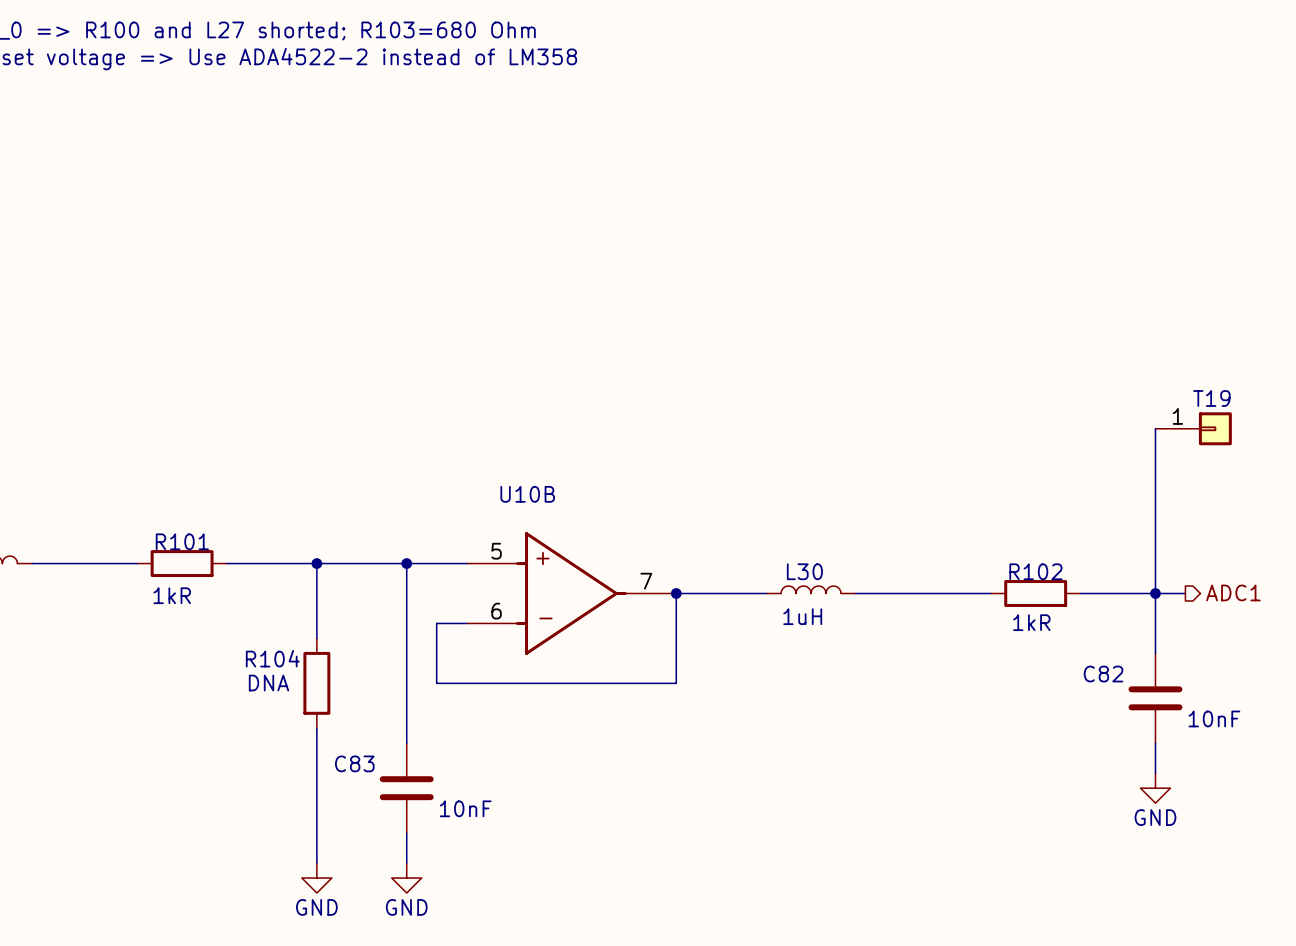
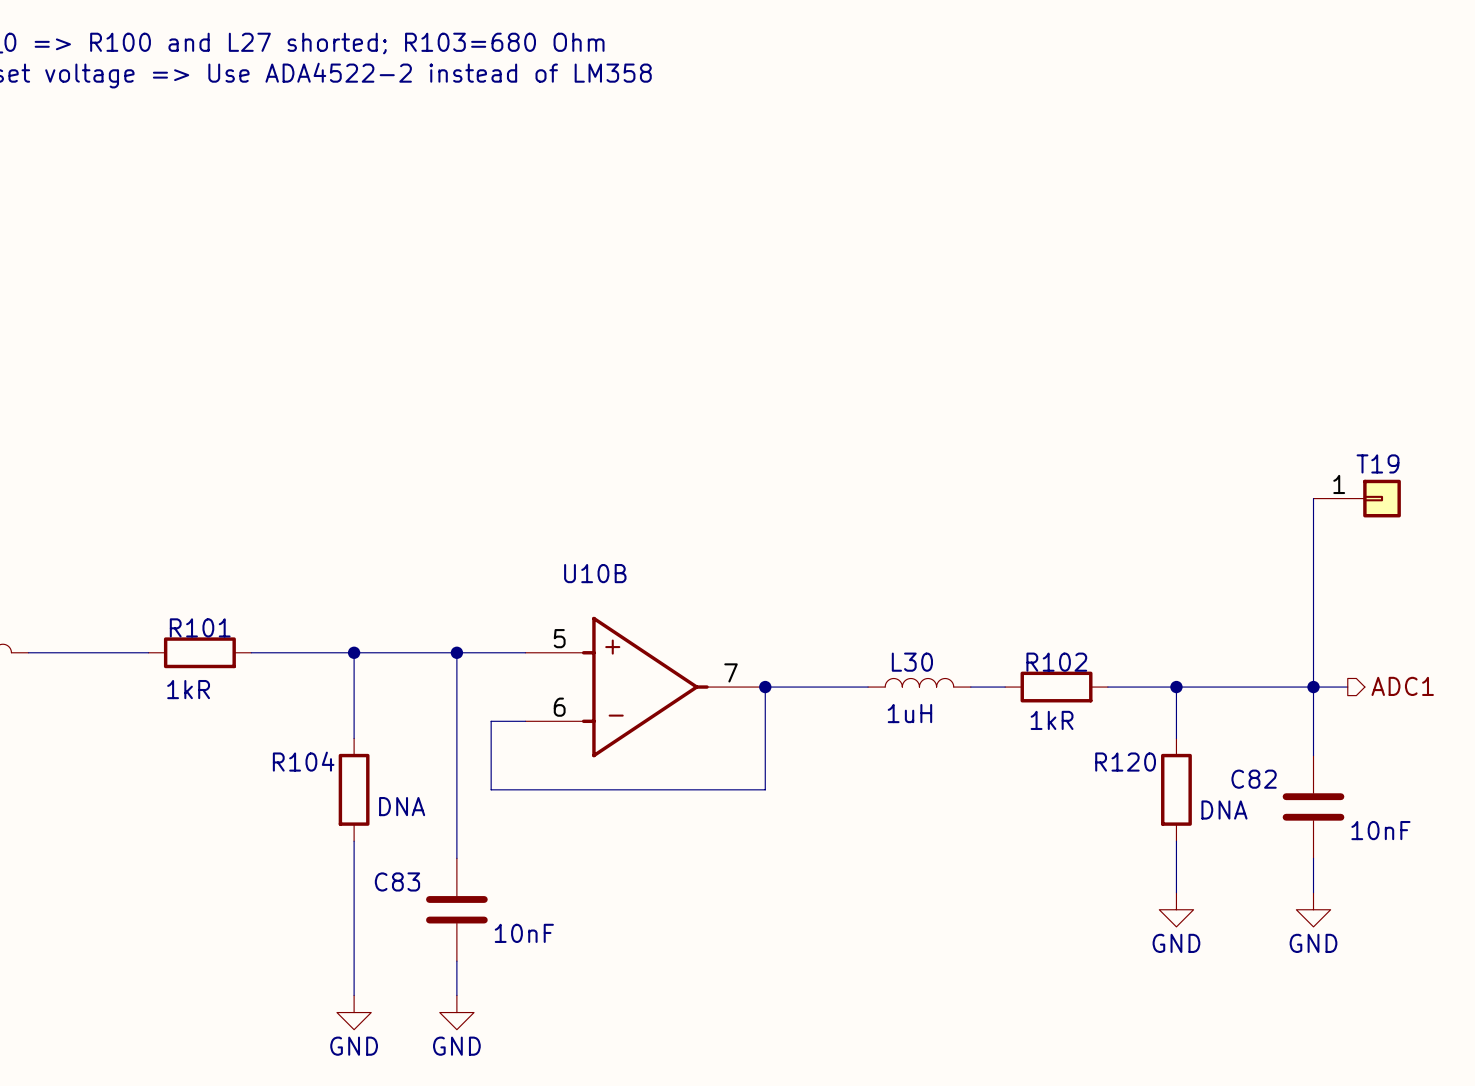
wire: (885, 593) (975, 593) -> (1125, 687) (1227, 687)
wire: none -> (1176, 687) (1176, 738)
R102 position: (1035, 593) -> (1056, 687)
junction: none -> (1176, 687)
R104 value position: DNA (268, 683) -> DNA (402, 806)
R120: none -> DNA (1176, 789)
wire: none -> (1176, 841) (1176, 892)
power symbol: none -> GND (1176, 909)

